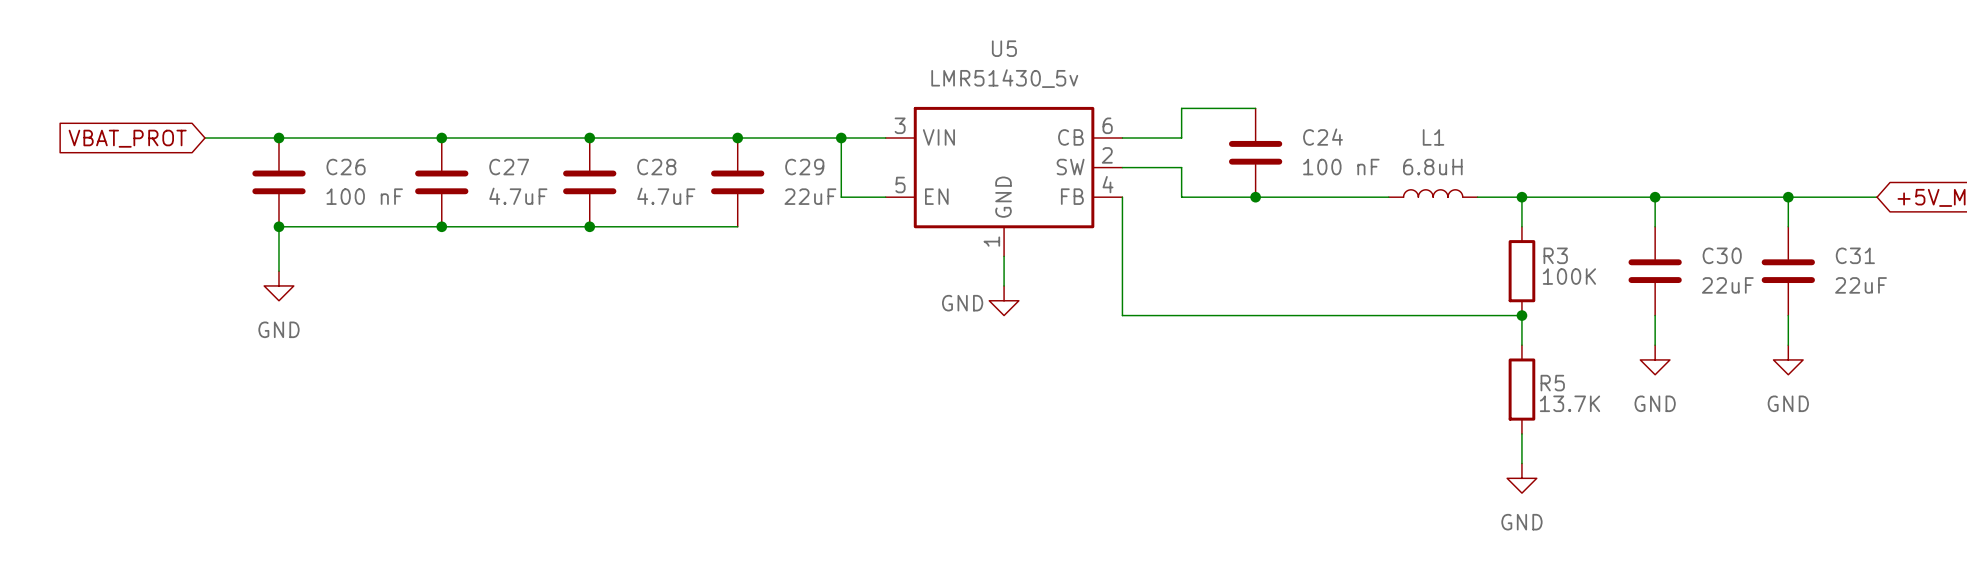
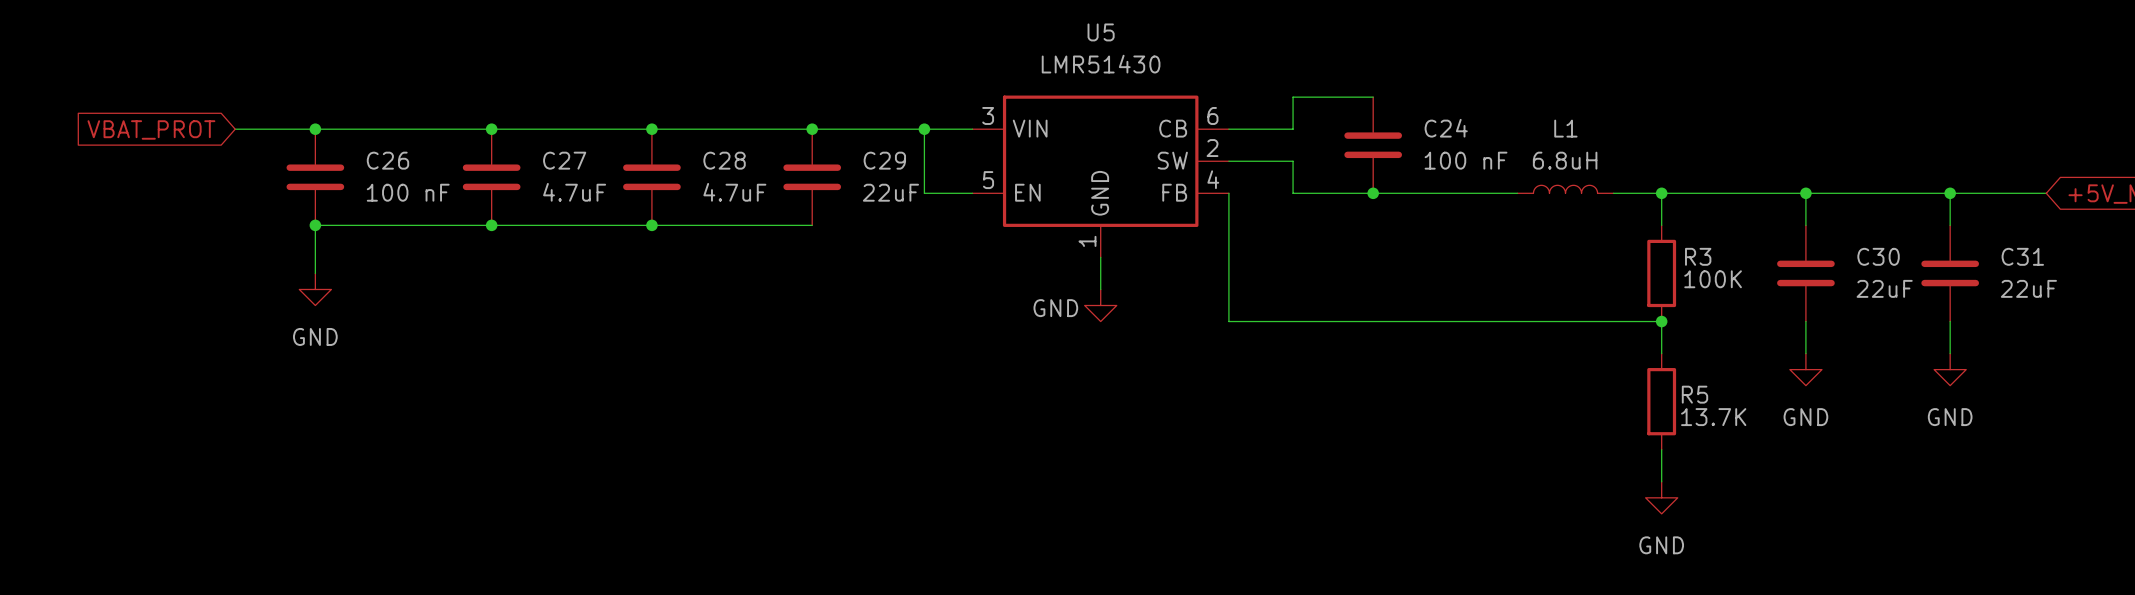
U5 value: LMR51430_5v (1004, 78) -> LMR51430 (1101, 64)

